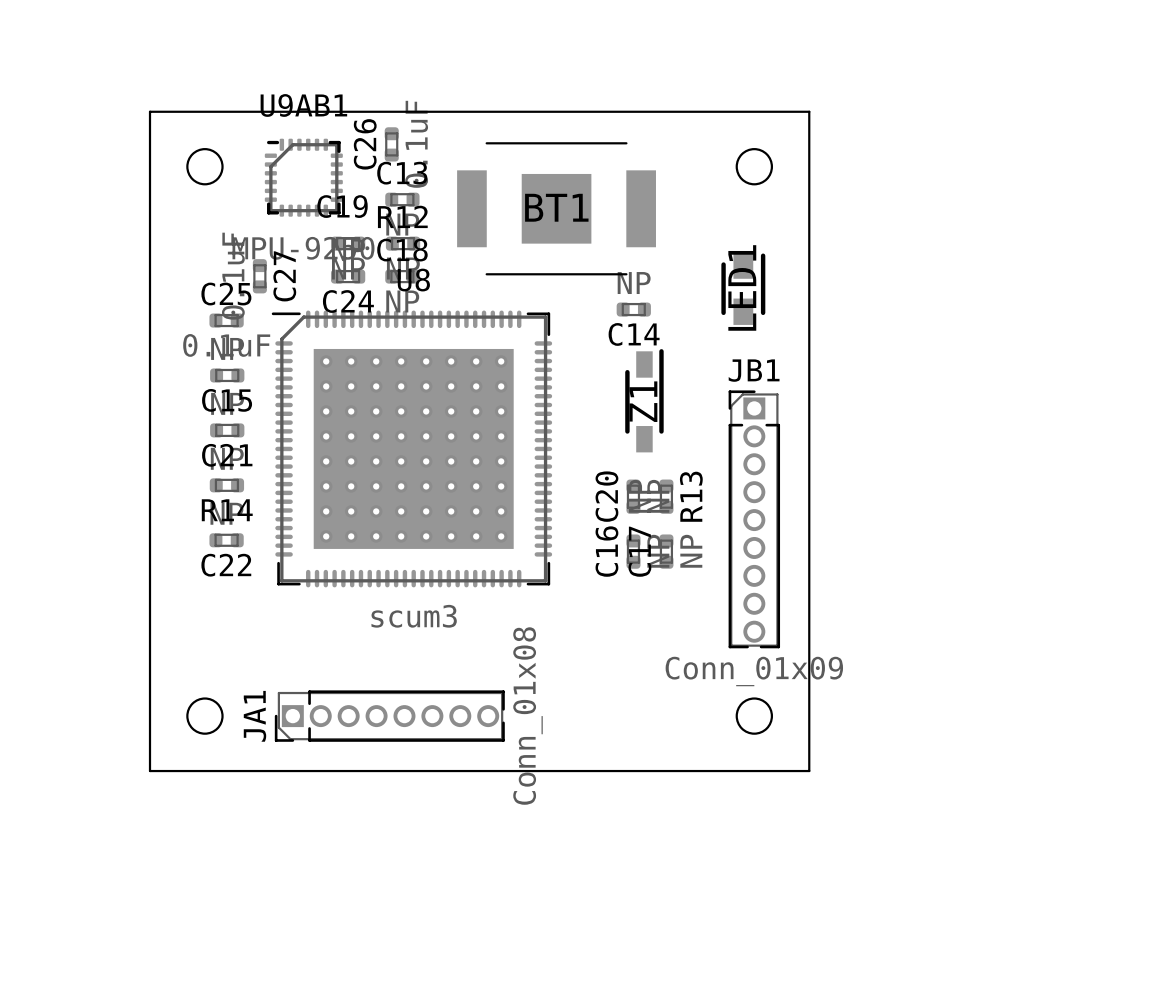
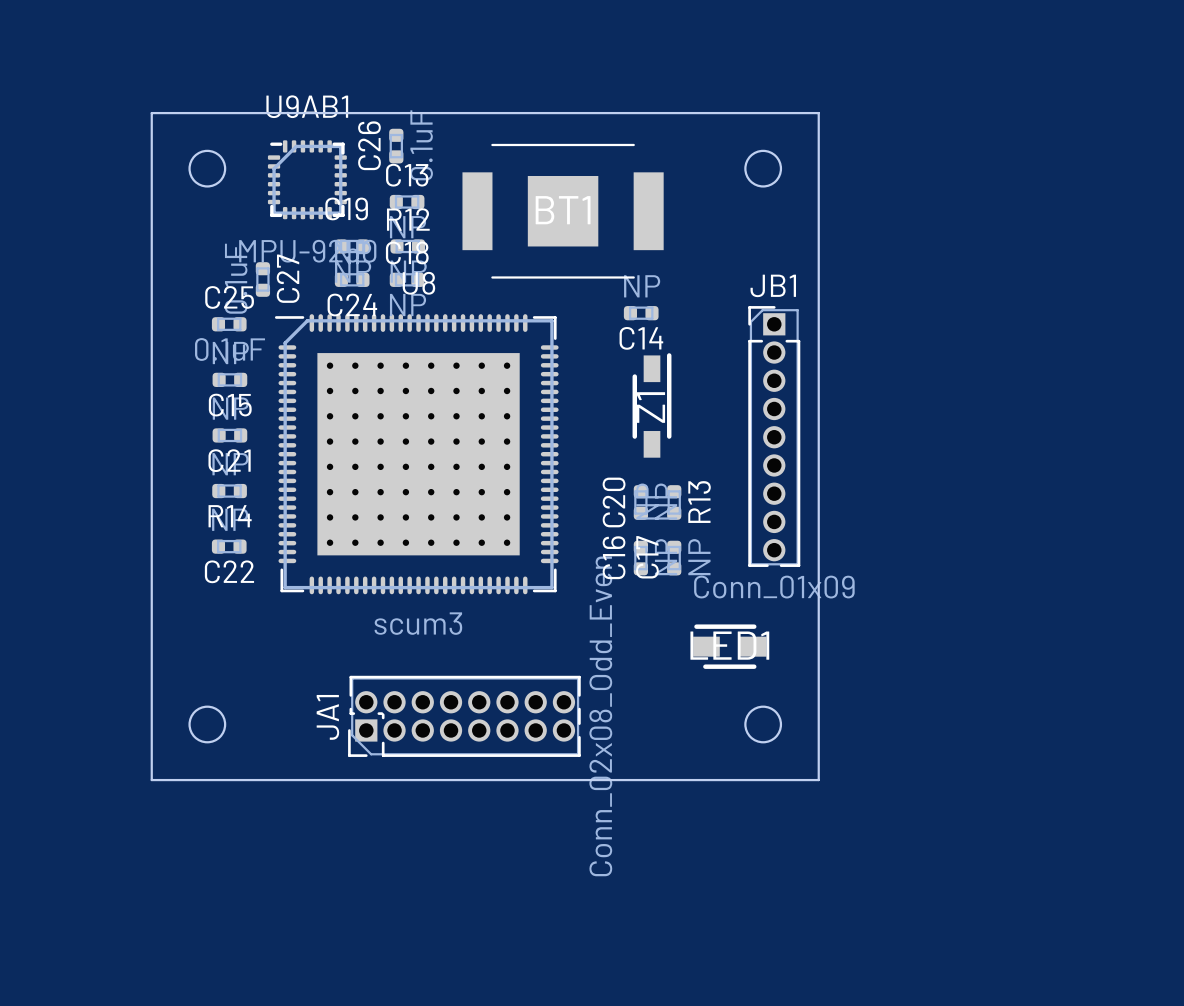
LED1 rotation: 0° (743, 288) -> 90° counterclockwise (729, 646)
LED1 position: (743, 288) -> (729, 646)
JB1 position: (754, 519) -> (774, 436)
JA1 footprint: [274, 690, 505, 742] -> [348, 675, 581, 757]
JA1 value: Conn_01x08 (527, 716) -> Conn_02x08_Odd_Even (600, 716)

